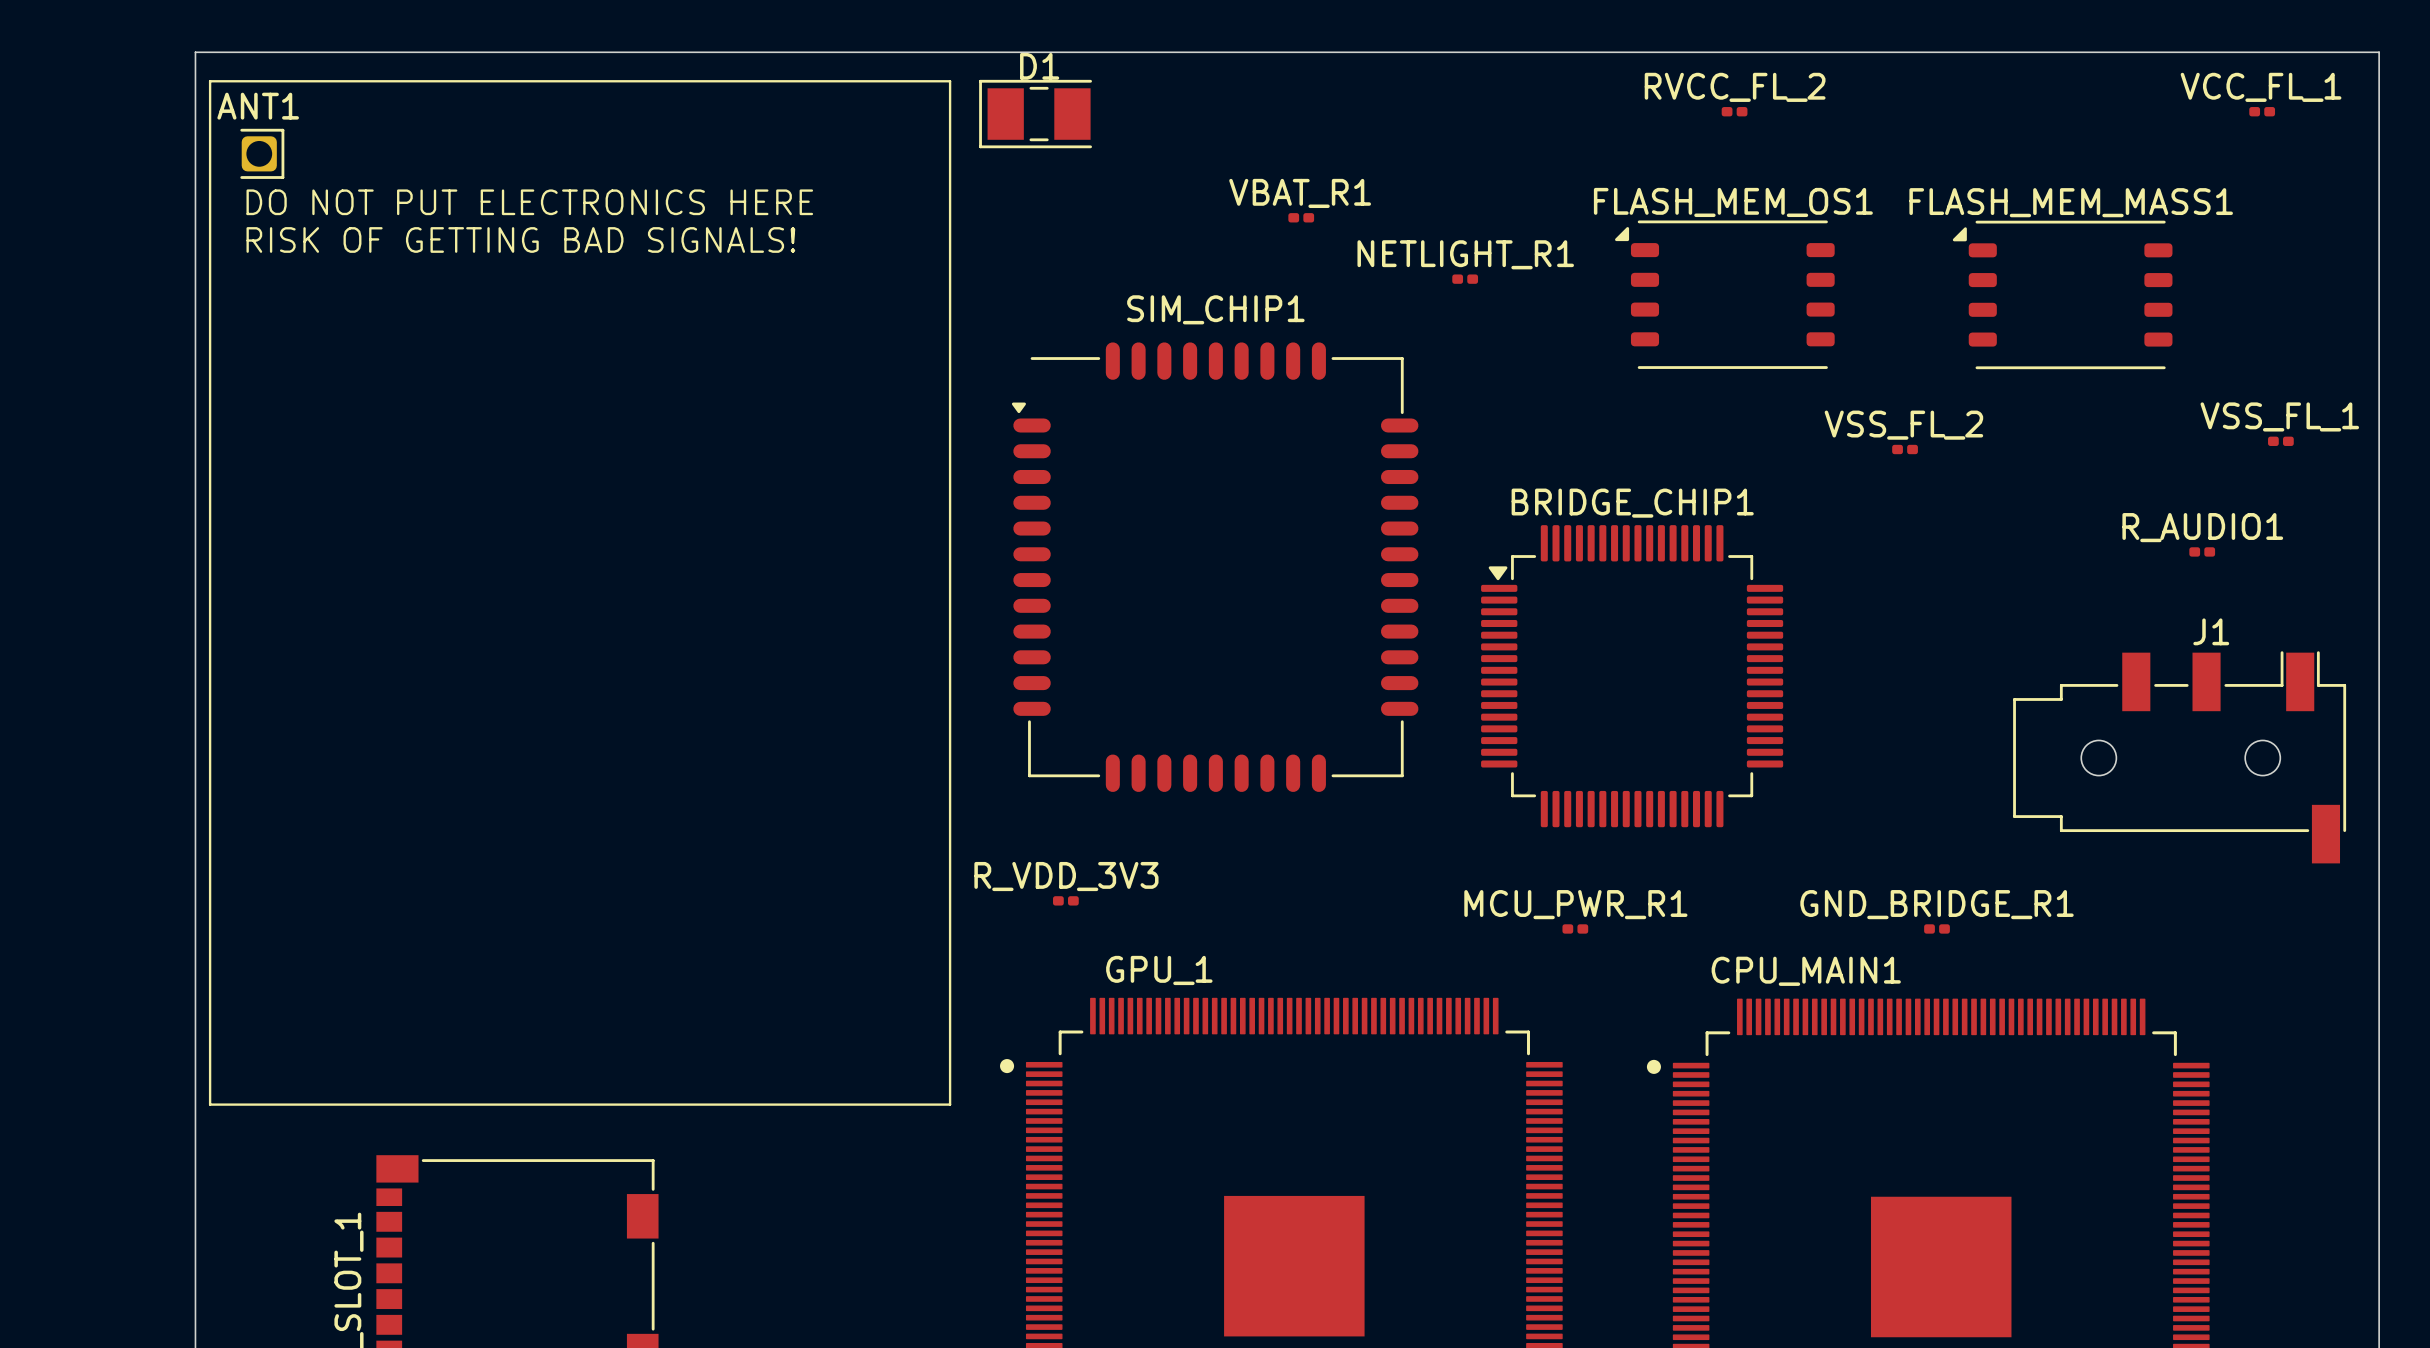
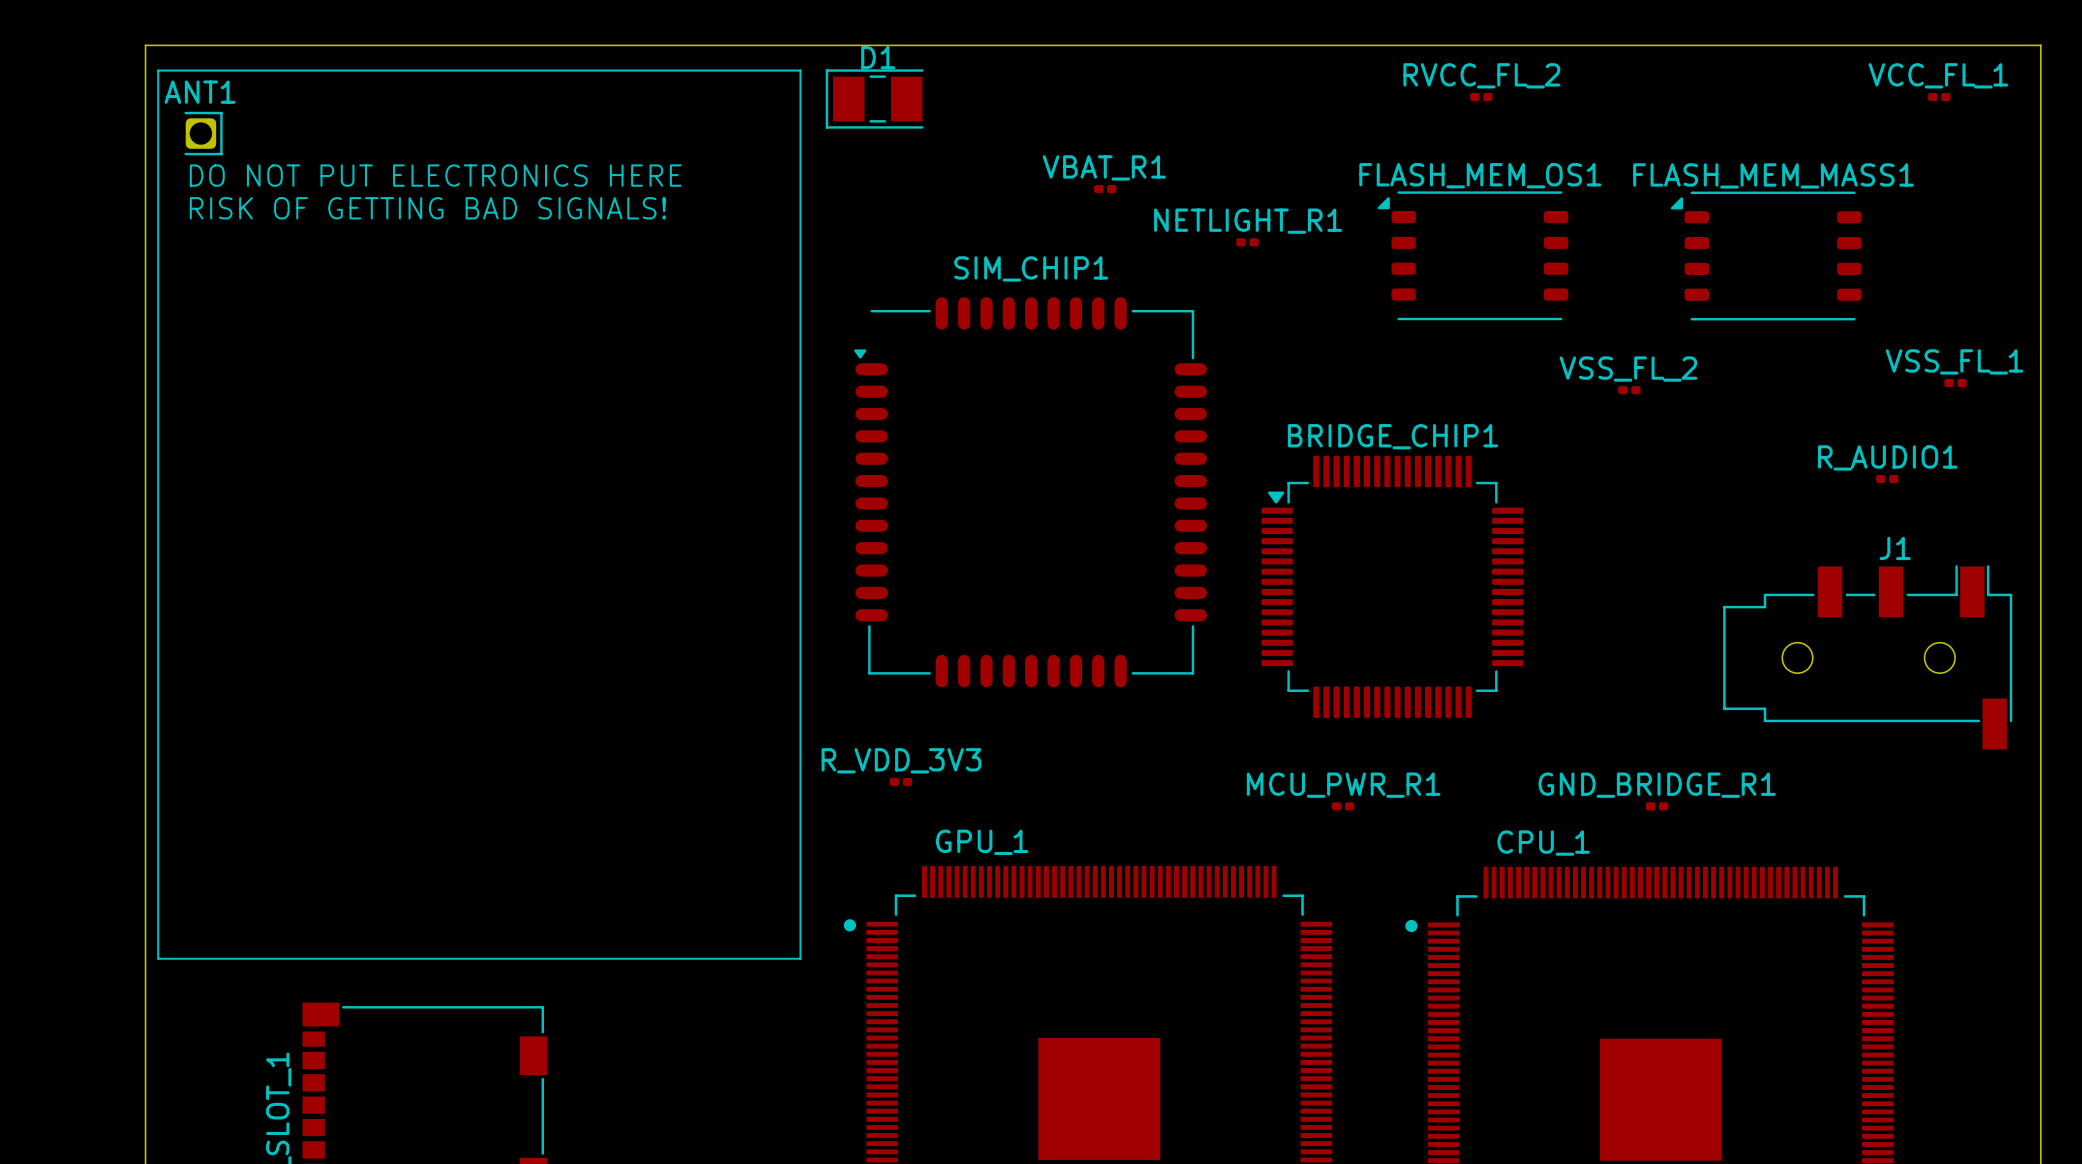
CPU_MAIN1 name: CPU_MAIN1 (1806, 971) -> CPU_1 (1543, 843)

